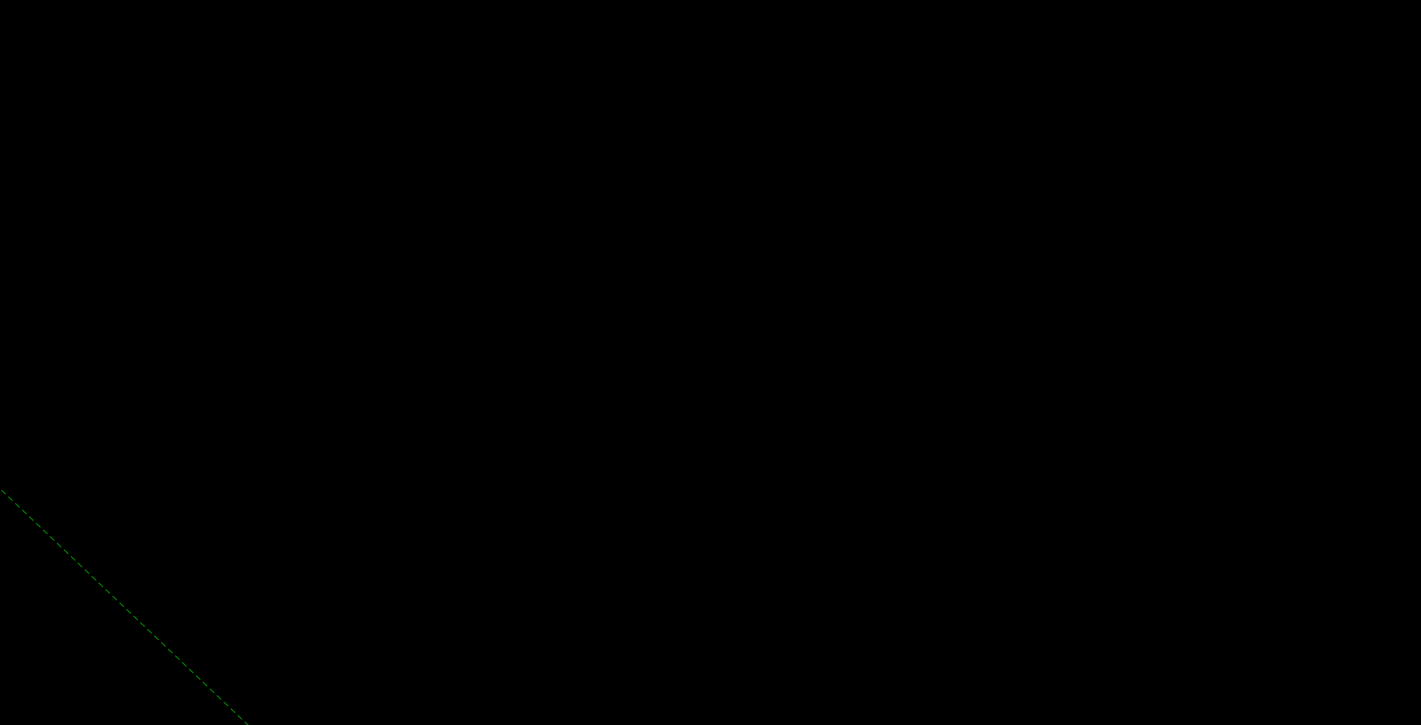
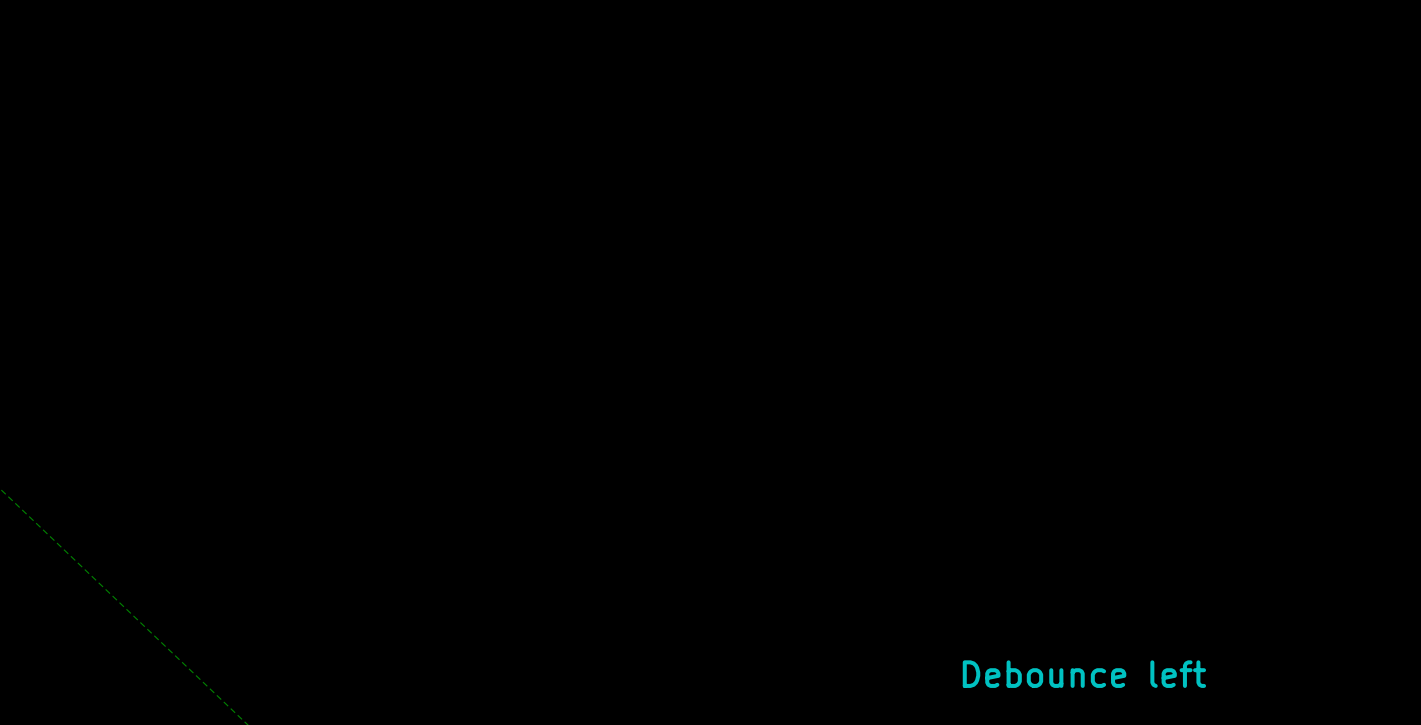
text: none -> Debounce left (1084, 674)

